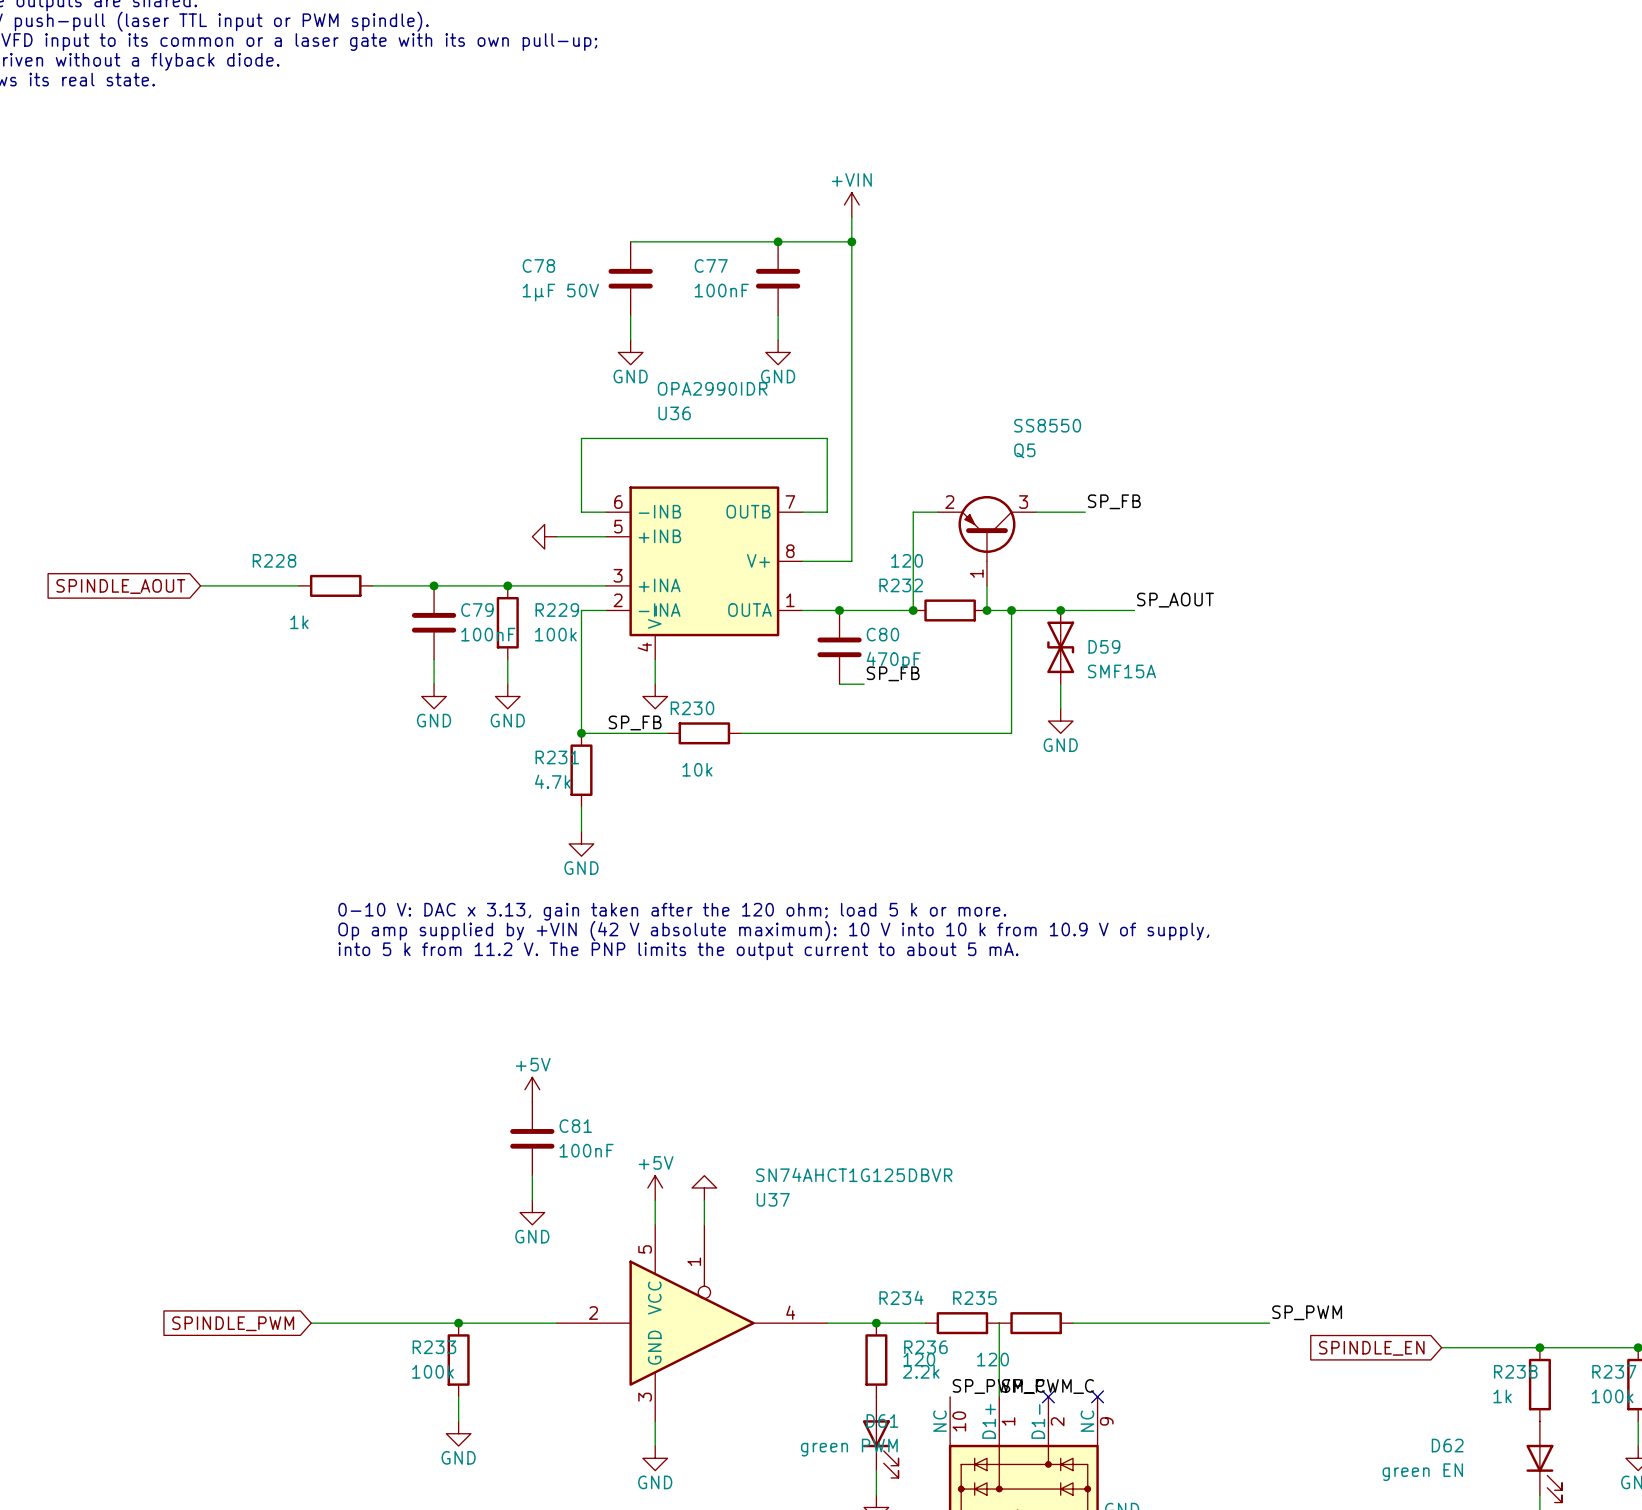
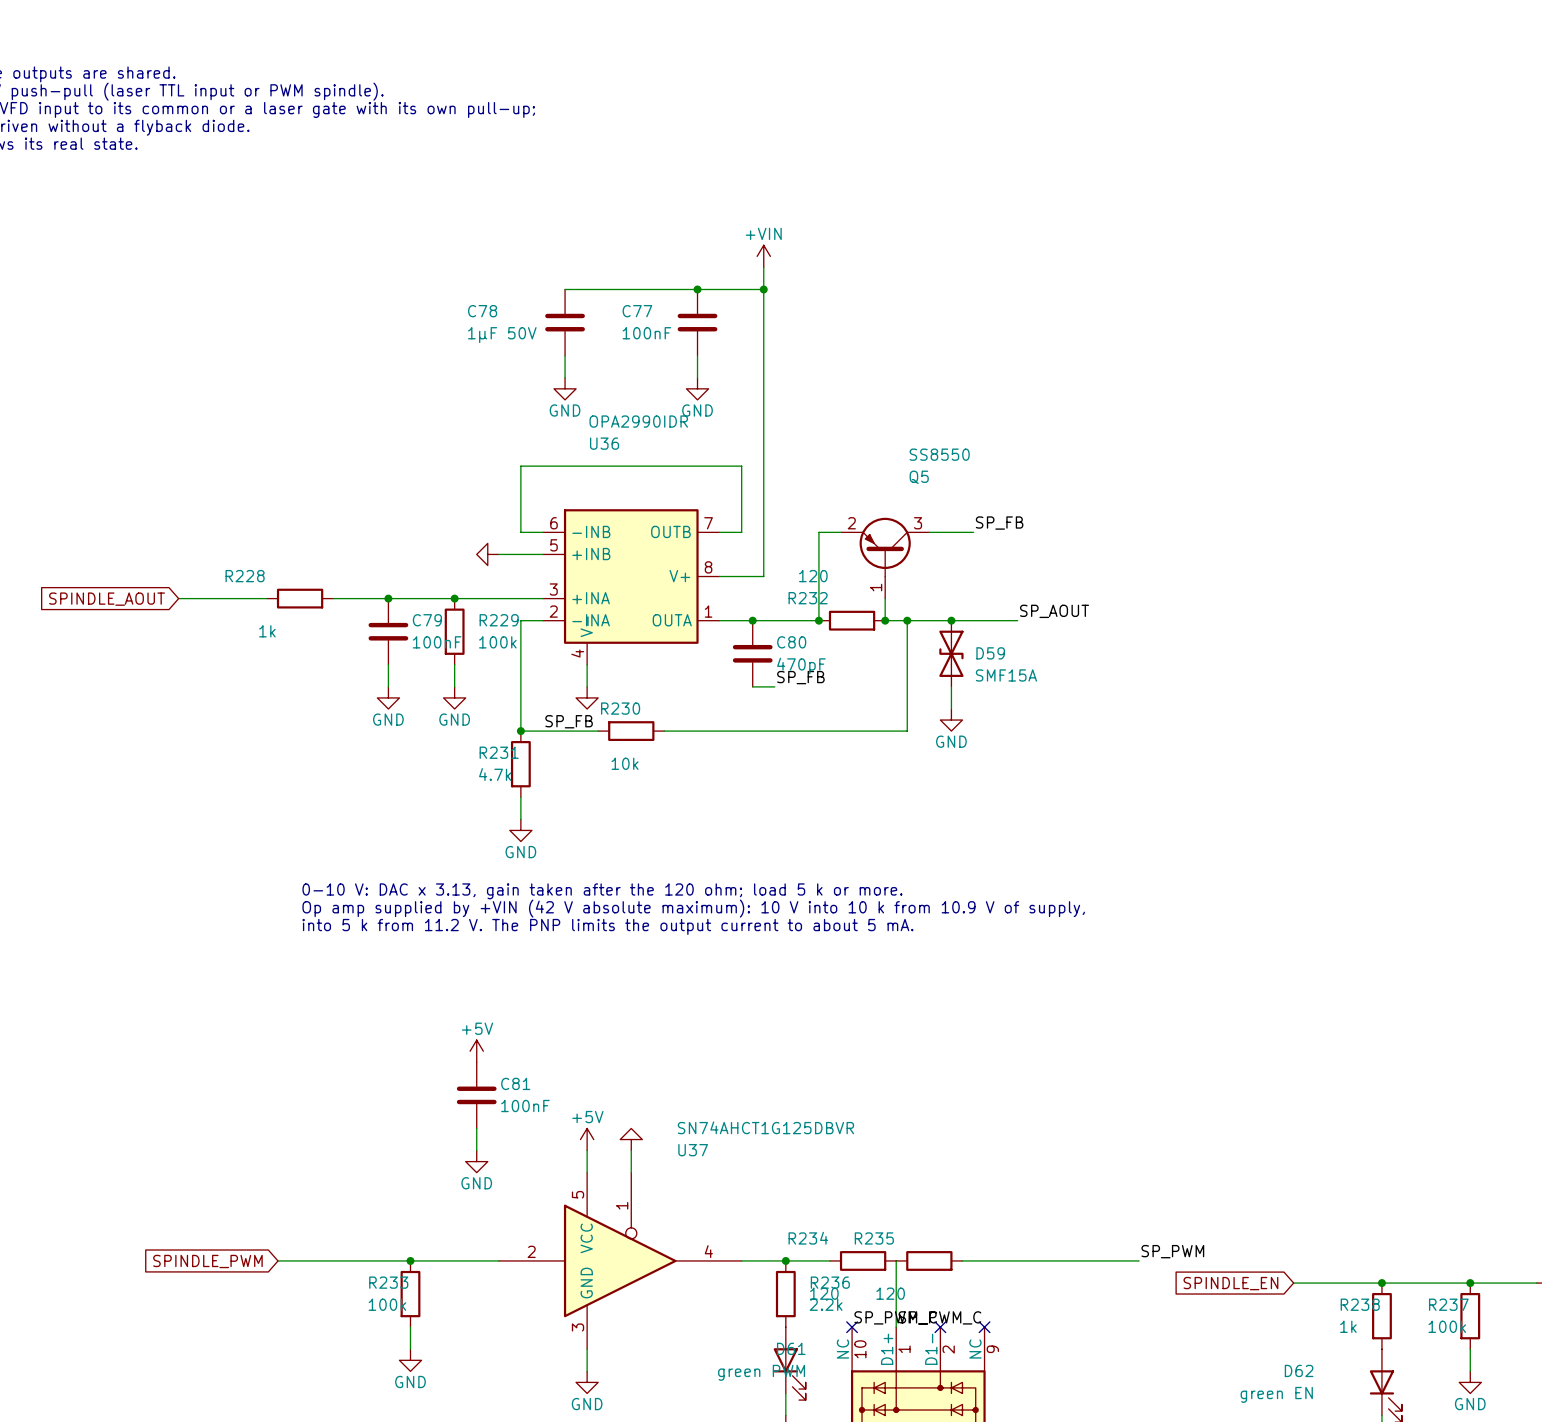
no-connect mark: none -> (852, 1327)

